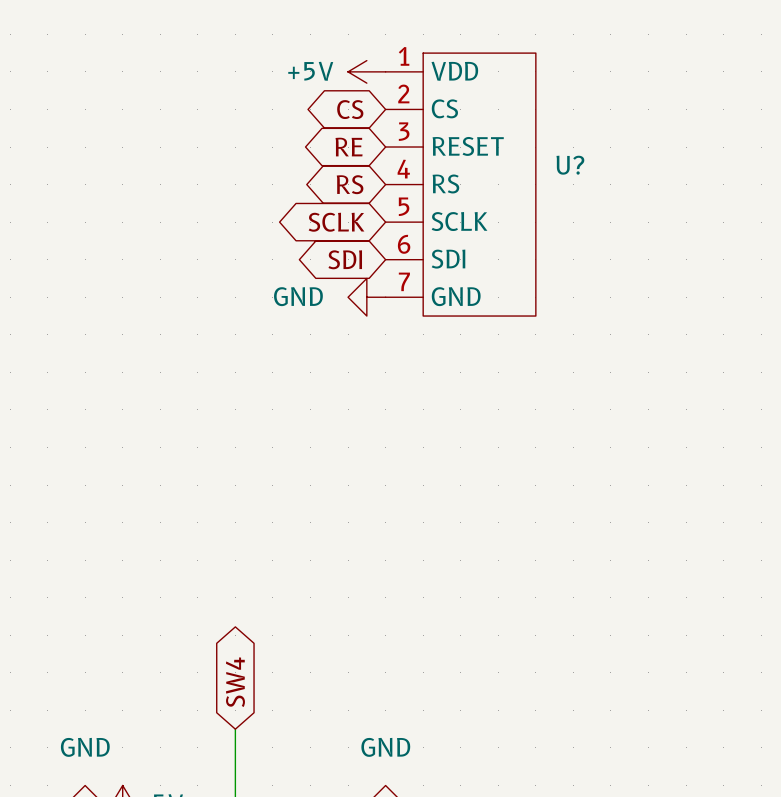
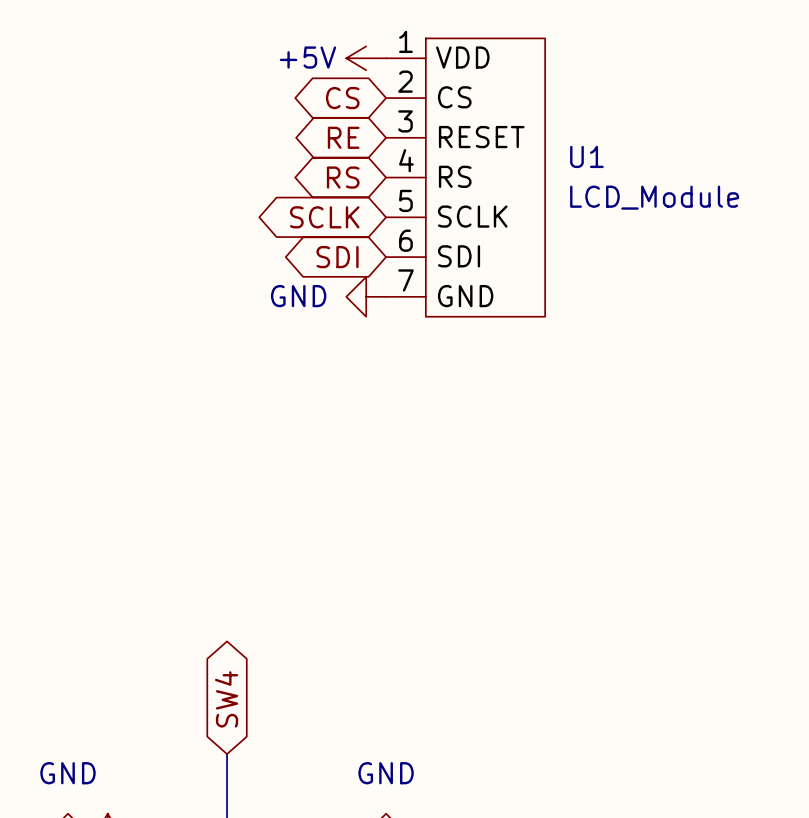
U? name: U? (570, 165) -> U1 (586, 156)
U? value: none -> LCD_Module (654, 197)

